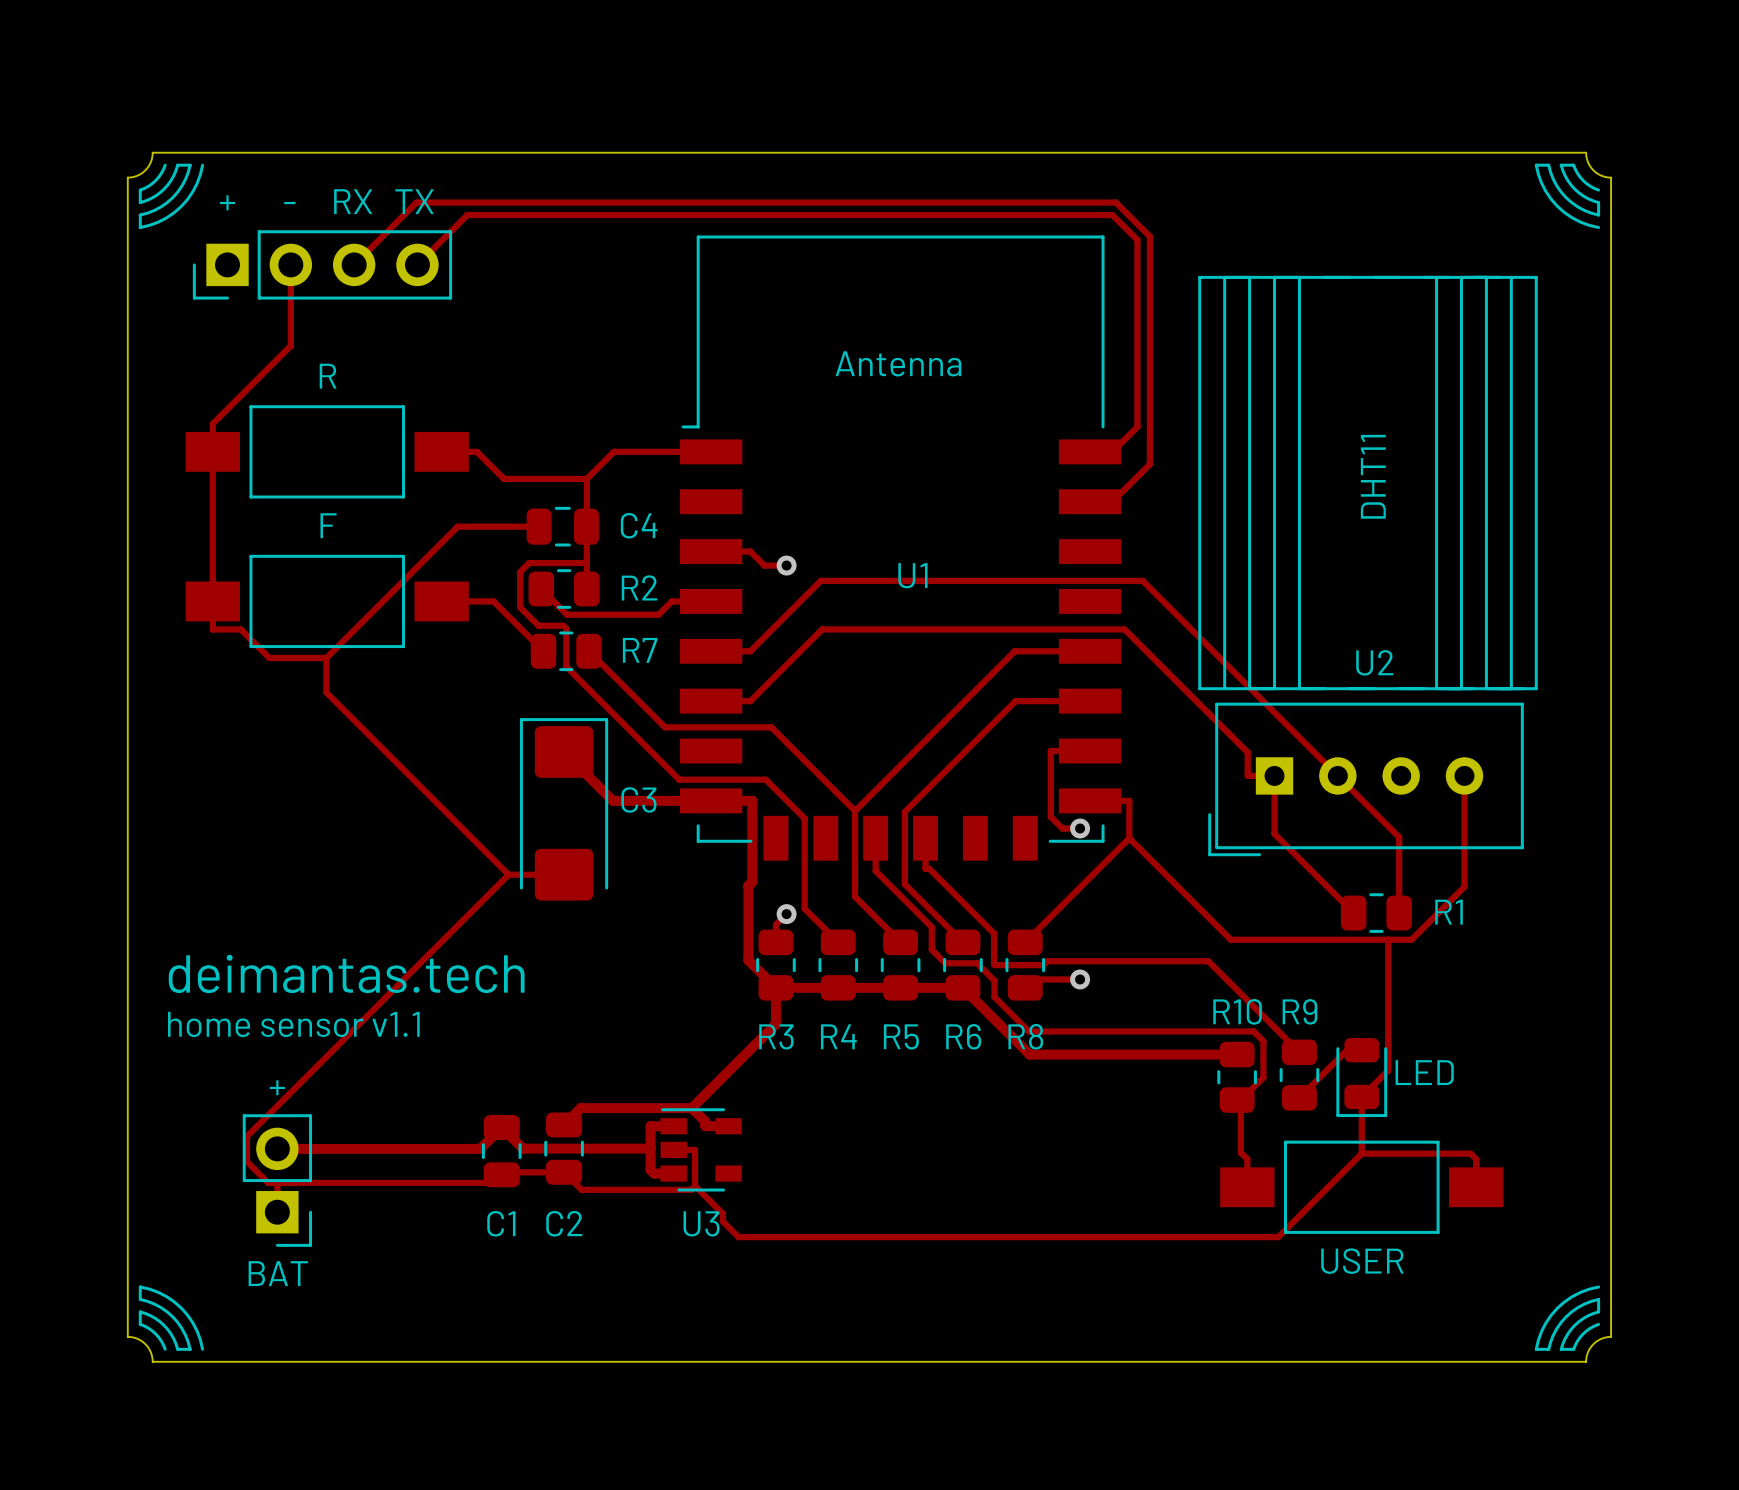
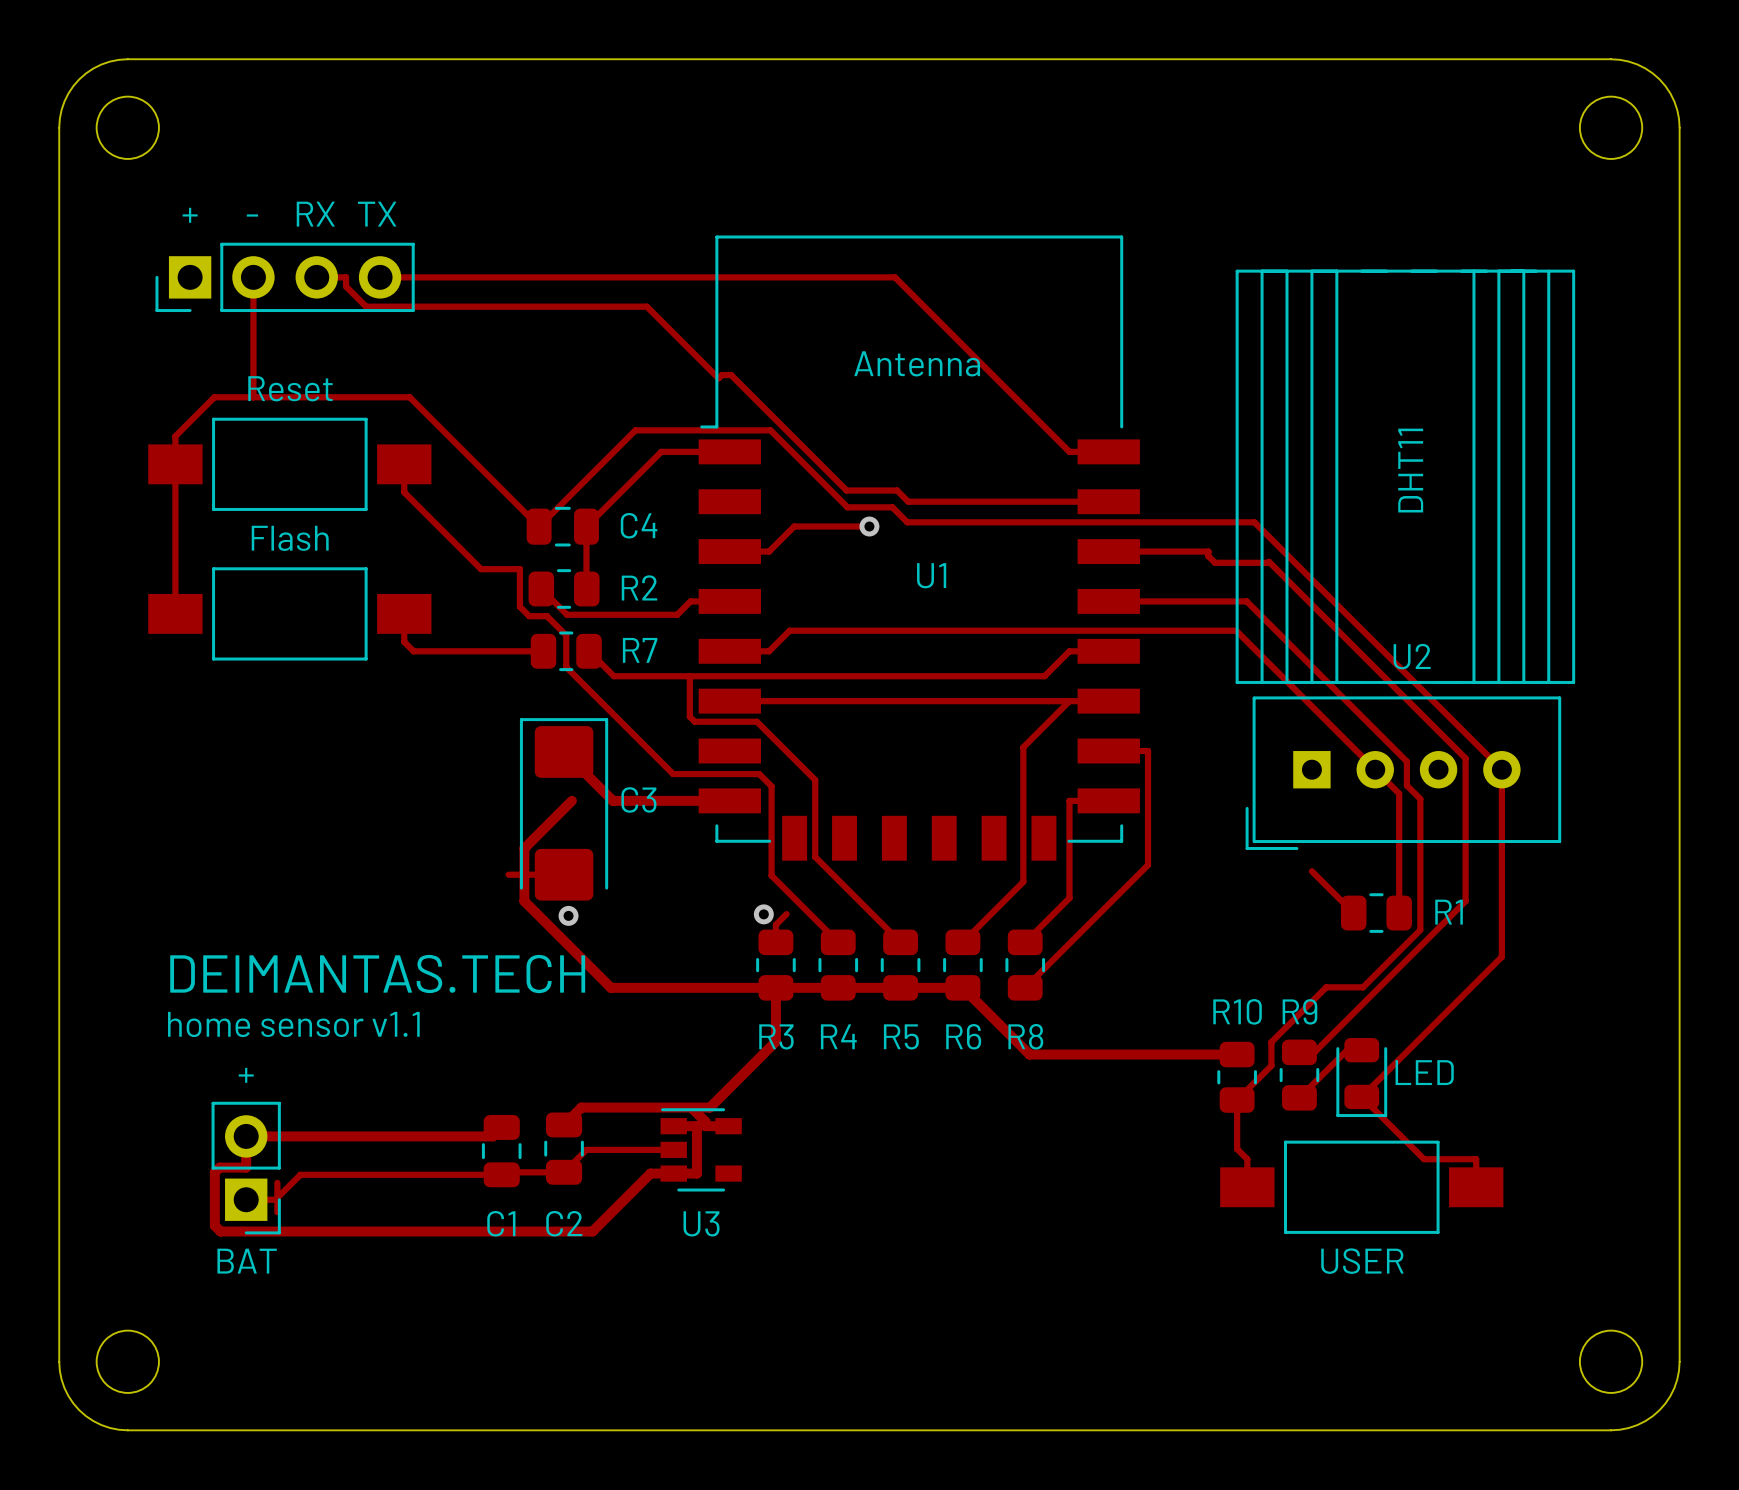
round board edge: none -> [96, 96, 160, 160]
round board edge: none -> [1579, 96, 1643, 160]
board edge: (152, 152) (1586, 152) (1588, 162) (1593, 170) (1601, 175) (1611, 177) (1611, 1336) (1601, 1338) (1593, 1344) (1588, 1352) (1586, 1361) (152, 1361) (150, 1352) (145, 1344) (137, 1338) (127, 1336) (127, 177) (137, 175) (145, 170) (150, 162) (152, 152) -> (127, 59) (101, 64) (79, 79) (64, 101) (59, 127) (59, 1361) (64, 1388) (79, 1410) (101, 1425) (127, 1430) (1611, 1430) (1637, 1425) (1659, 1410) (1674, 1388) (1679, 1361) (1679, 127) (1674, 101) (1659, 79) (1637, 64) (1611, 59) (127, 59)
line: (165, 165) (155, 180) (140, 190) (140, 202) (155, 196) (164, 189) (171, 180) (177, 165) (190, 165) (181, 185) (172, 197) (161, 206) (140, 215) (140, 227) (166, 217) (181, 206) (197, 183) (202, 165) -> none
line: (1598, 190) (1583, 180) (1573, 165) (1561, 165) (1567, 180) (1574, 189) (1583, 196) (1598, 202) (1598, 215) (1577, 206) (1566, 197) (1556, 185) (1548, 165) (1536, 165) (1545, 191) (1557, 206) (1572, 217) (1598, 227) -> none
text position: RX (353, 201) -> RX (315, 214)
text position: TX (414, 201) -> TX (377, 214)
text position: + (227, 202) -> + (190, 215)
text position: - (289, 203) -> - (252, 215)
track: (290, 264) (290, 345) (212, 423) (212, 629) (240, 629) (269, 657) (326, 657) -> none
part position: (322, 264) -> (285, 277)
track: (354, 264) (416, 202) (1115, 202) (1149, 236) (1149, 464) (1112, 501) (1108, 501) -> none
track: (417, 264) (467, 215) (1112, 215) (1137, 239) (1137, 426) (1112, 451) (1108, 451) -> none
track: none -> (253, 277) (253, 397)
track: none -> (316, 277) (346, 277) (346, 286) (366, 306) (646, 306) (718, 378) (721, 375) (731, 375) (846, 490) (897, 490) (908, 501) (1090, 501)
track: none -> (380, 277) (894, 277) (1069, 451) (1090, 451)
line: (1199, 277) (1536, 277) (1536, 688) (1199, 688) (1199, 277) -> (1237, 271) (1573, 271) (1573, 682) (1237, 682) (1237, 271)
line: (1224, 277) (1224, 688) -> (1262, 271) (1262, 682)
line: (1249, 277) (1249, 688) -> (1286, 271) (1286, 682)
line: (1274, 277) (1274, 688) -> (1311, 271) (1311, 682)
line: (1299, 277) (1299, 688) -> (1336, 271) (1336, 682)
line: (1436, 277) (1436, 688) -> (1473, 271) (1473, 682)
line: (1461, 277) (1461, 688) -> (1498, 271) (1498, 682)
line: (1486, 277) (1486, 688) -> (1523, 271) (1523, 682)
line: (1511, 277) (1511, 688) -> (1548, 271) (1548, 682)
text: R (328, 376) -> none
text: none -> Reset (290, 388)
part position: (327, 451) -> (289, 464)
track: (441, 451) (476, 451) (504, 478) (586, 478) (586, 588) -> none
track: (613, 451) (661, 451) -> (586, 588) (586, 526) (661, 451)
track: none -> (586, 478) (539, 526) (409, 397) (214, 397) (175, 436) (175, 613)
text: F (328, 525) -> none
track: (539, 526) (457, 526) (326, 657) -> none
text: none -> Flash (290, 538)
U1 position: (900, 548) -> (919, 548)
track: (750, 551) (764, 565) (786, 565) -> (750, 551) (769, 551) (794, 526) (869, 526)
track: (586, 563) (529, 563) (520, 572) (520, 607) (538, 625) (563, 625) (566, 628) (566, 635) -> (404, 464) (404, 492) (481, 569) (519, 569) (519, 606) (529, 616) (546, 616) (566, 635)
via position: (786, 565) -> (869, 526)
part position: (327, 601) -> (289, 613)
track: (441, 601) (493, 601) (543, 651) -> (404, 613) (404, 641) (413, 651) (543, 651)
track: (690, 601) (671, 601) (658, 614) (567, 614) -> (690, 601) (677, 614) (567, 614)
track: (750, 651) (820, 580) (1142, 580) (1399, 837) -> (750, 651) (769, 651) (789, 630) (1236, 630) (1399, 793) (1399, 837)
track: (1069, 651) (1014, 651) (855, 810) -> none
track: (326, 657) (326, 692) (508, 874) (246, 1136) (246, 1161) (268, 1182) (493, 1182) (501, 1174) -> (246, 1199) (275, 1199) (300, 1174) (501, 1174)
track: (566, 666) (679, 779) (765, 779) (804, 818) (804, 908) -> (566, 666) (673, 774) (759, 774) (771, 786) (771, 875) (804, 908)
track: (613, 676) (665, 727) (771, 727) (855, 810) -> (613, 676) (1044, 676) (1069, 651)
track: (750, 701) (822, 629) (1124, 629) (1247, 752) (1247, 775) (1274, 775) (1274, 833) (1311, 871) -> (750, 701) (1015, 701)
track: (1015, 701) (904, 811) (904, 884) (962, 942) -> (1069, 701) (1023, 747) (1023, 881) (962, 942)
track: (1090, 751) (1050, 751) (1050, 816) (1062, 828) (1080, 828) -> none
track: (1464, 775) (1464, 886) (1411, 939) (1230, 939) (1129, 838) -> none
U2 position: (1366, 779) -> (1403, 773)
track: (729, 800) (752, 800) (752, 881) (748, 885) (748, 960) (775, 987) -> (571, 800) (524, 848) (524, 901) (611, 987) (775, 987)
track: (1108, 800) (1129, 800) (1129, 838) -> none
track: (855, 810) (855, 896) -> (689, 676) (689, 716) (694, 721) (756, 721) (815, 780) (815, 856) (855, 896)
via: (1080, 828) -> none
track: (875, 838) (875, 870) (931, 927) (931, 949) (945, 963) (977, 963) (994, 980) (994, 997) (1028, 1031) (1253, 1031) (1263, 1041) (1263, 1077) (1240, 1100) (1240, 1152) -> (1108, 601) (1246, 601) (1406, 761) (1406, 785) (1420, 798) (1420, 930) (1363, 987) (1326, 987) (1271, 1042) (1271, 1065) (1237, 1100) (1237, 1149) (1240, 1152)
track: (925, 838) (925, 868) (929, 868) (994, 933) (994, 965) (1043, 965) (1047, 961) (1208, 961) (1299, 1052) -> (1108, 551) (1208, 551) (1208, 556) (1215, 562) (1269, 561) (1465, 758) (1465, 901) (1314, 1052) (1299, 1052)
track: (1129, 838) (1069, 898) -> (1090, 800) (1069, 800) (1069, 898)
via position: (786, 914) -> (763, 914)
via: none -> (568, 915)
track: (1388, 939) (1388, 1070) -> (613, 451) (635, 430) (770, 430) (847, 507) (892, 507) (907, 522) (1254, 522) (1501, 769) (1501, 956) (1388, 1070)
text: deimantas.tech (346, 973) -> DEIMANTAS.TECH (377, 974)
track: (1033, 979) (1080, 979) -> (1033, 979) (1148, 865) (1148, 751) (1108, 751)
via: (1080, 979) -> none
track: (775, 1024) (691, 1108) (580, 1108) -> (775, 1024) (775, 1041) (709, 1107) (580, 1108)
text position: + (277, 1087) -> + (246, 1075)
track: (1361, 1096) (1361, 1153) -> none
track: (673, 1126) (650, 1126) (650, 1169) (654, 1173) -> (673, 1126) (696, 1126) (696, 1173) (673, 1173)
track: (501, 1127) (522, 1148) (650, 1148) -> none
track: (492, 1136) (480, 1148) (277, 1148) -> (492, 1136) (246, 1136) (246, 1167) (219, 1167) (214, 1172) (214, 1225) (220, 1231) (592, 1231) (650, 1173) (654, 1173)
track: (673, 1149) (695, 1149) (695, 1186) -> none
track: (1361, 1153) (1470, 1153) (1476, 1159) -> (1361, 1096) (1424, 1159) (1476, 1159)
track: (1361, 1153) (1278, 1237) (738, 1237) (722, 1221) (722, 1213) (695, 1186) -> none
track: (564, 1172) (581, 1189) (691, 1189) (695, 1186) -> (564, 1172) (586, 1149) (673, 1149)
part position: (277, 1180) -> (246, 1168)
text position: BAT (278, 1273) -> BAT (247, 1261)
line: (1598, 1286) (1572, 1296) (1557, 1308) (1545, 1322) (1536, 1349) (1548, 1349) (1556, 1328) (1566, 1316) (1577, 1307) (1598, 1299) (1598, 1311) (1583, 1318) (1574, 1325) (1567, 1334) (1561, 1349) (1573, 1349) (1583, 1333) (1598, 1324) -> none
round board edge: none -> [96, 1329, 160, 1394]
round board edge: none -> [1579, 1329, 1643, 1394]
line: (165, 1349) (155, 1333) (140, 1324) (140, 1311) (155, 1318) (164, 1325) (171, 1334) (177, 1349) (190, 1349) (181, 1328) (172, 1316) (161, 1307) (140, 1299) (140, 1286) (166, 1296) (181, 1308) (192, 1322) (202, 1349) -> none

